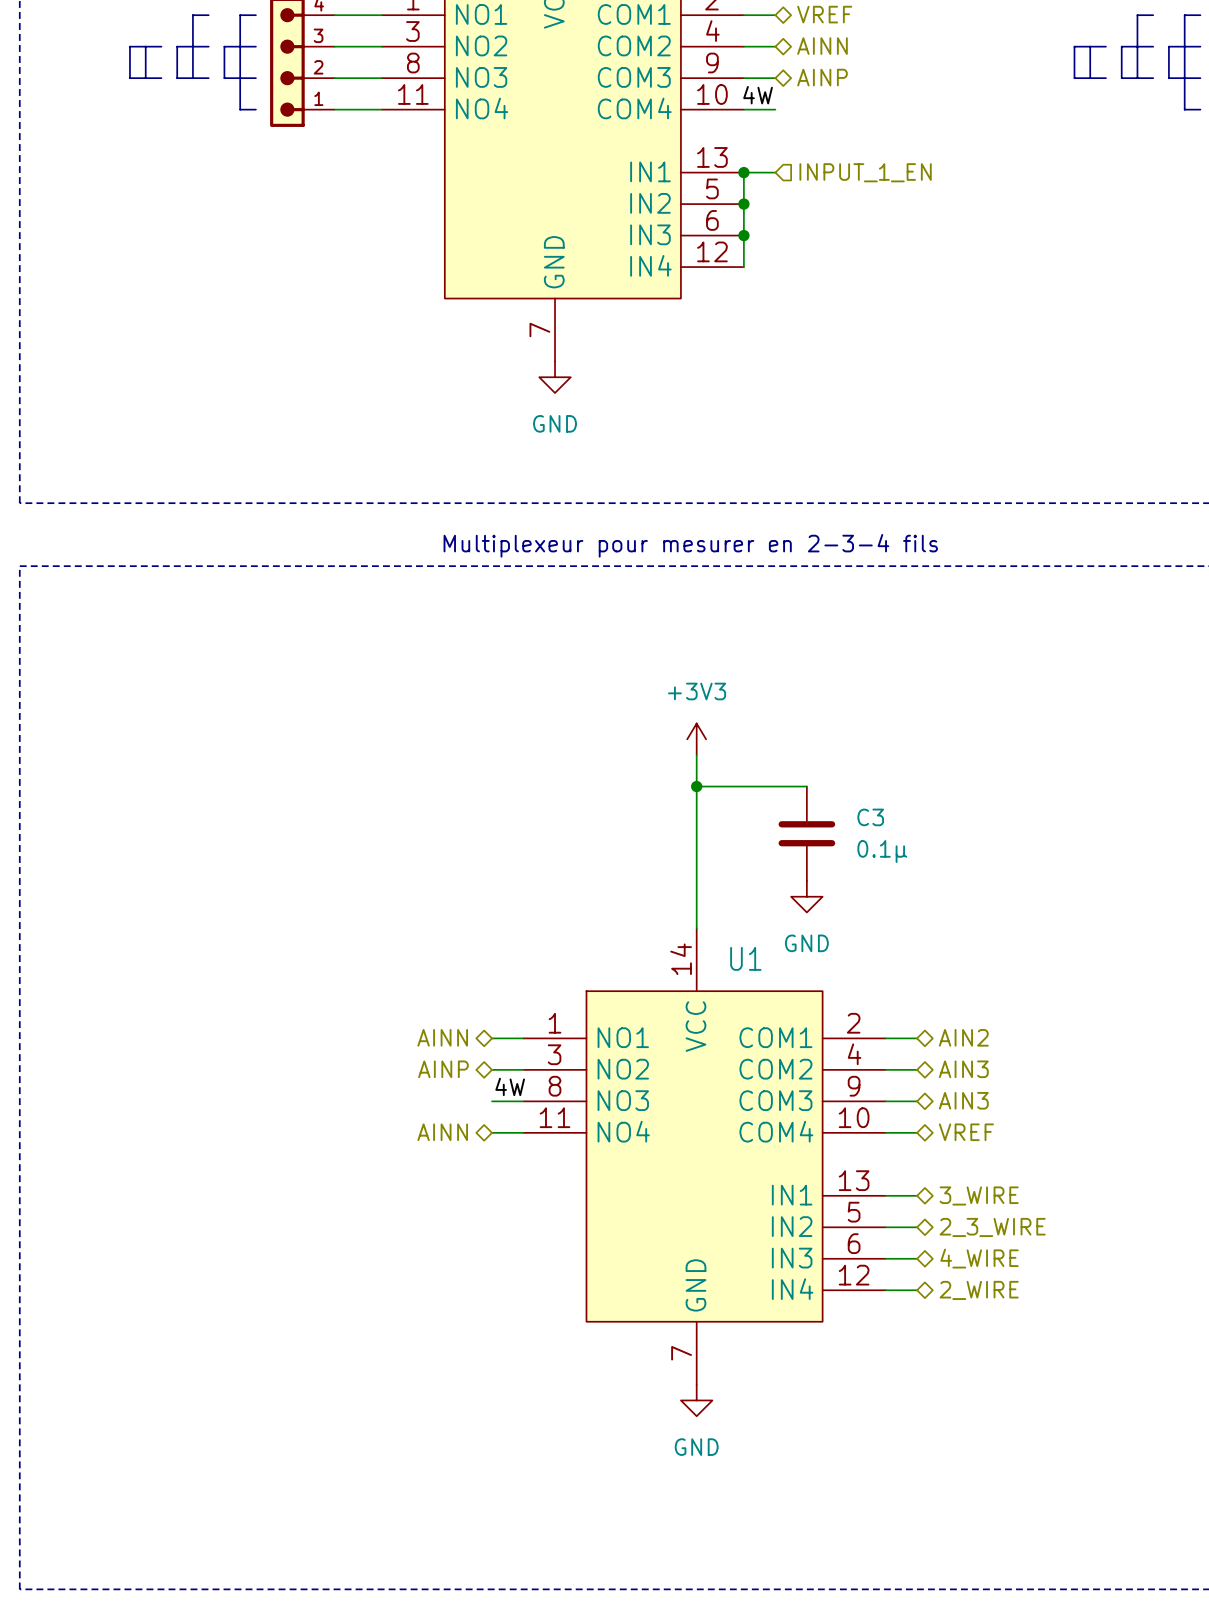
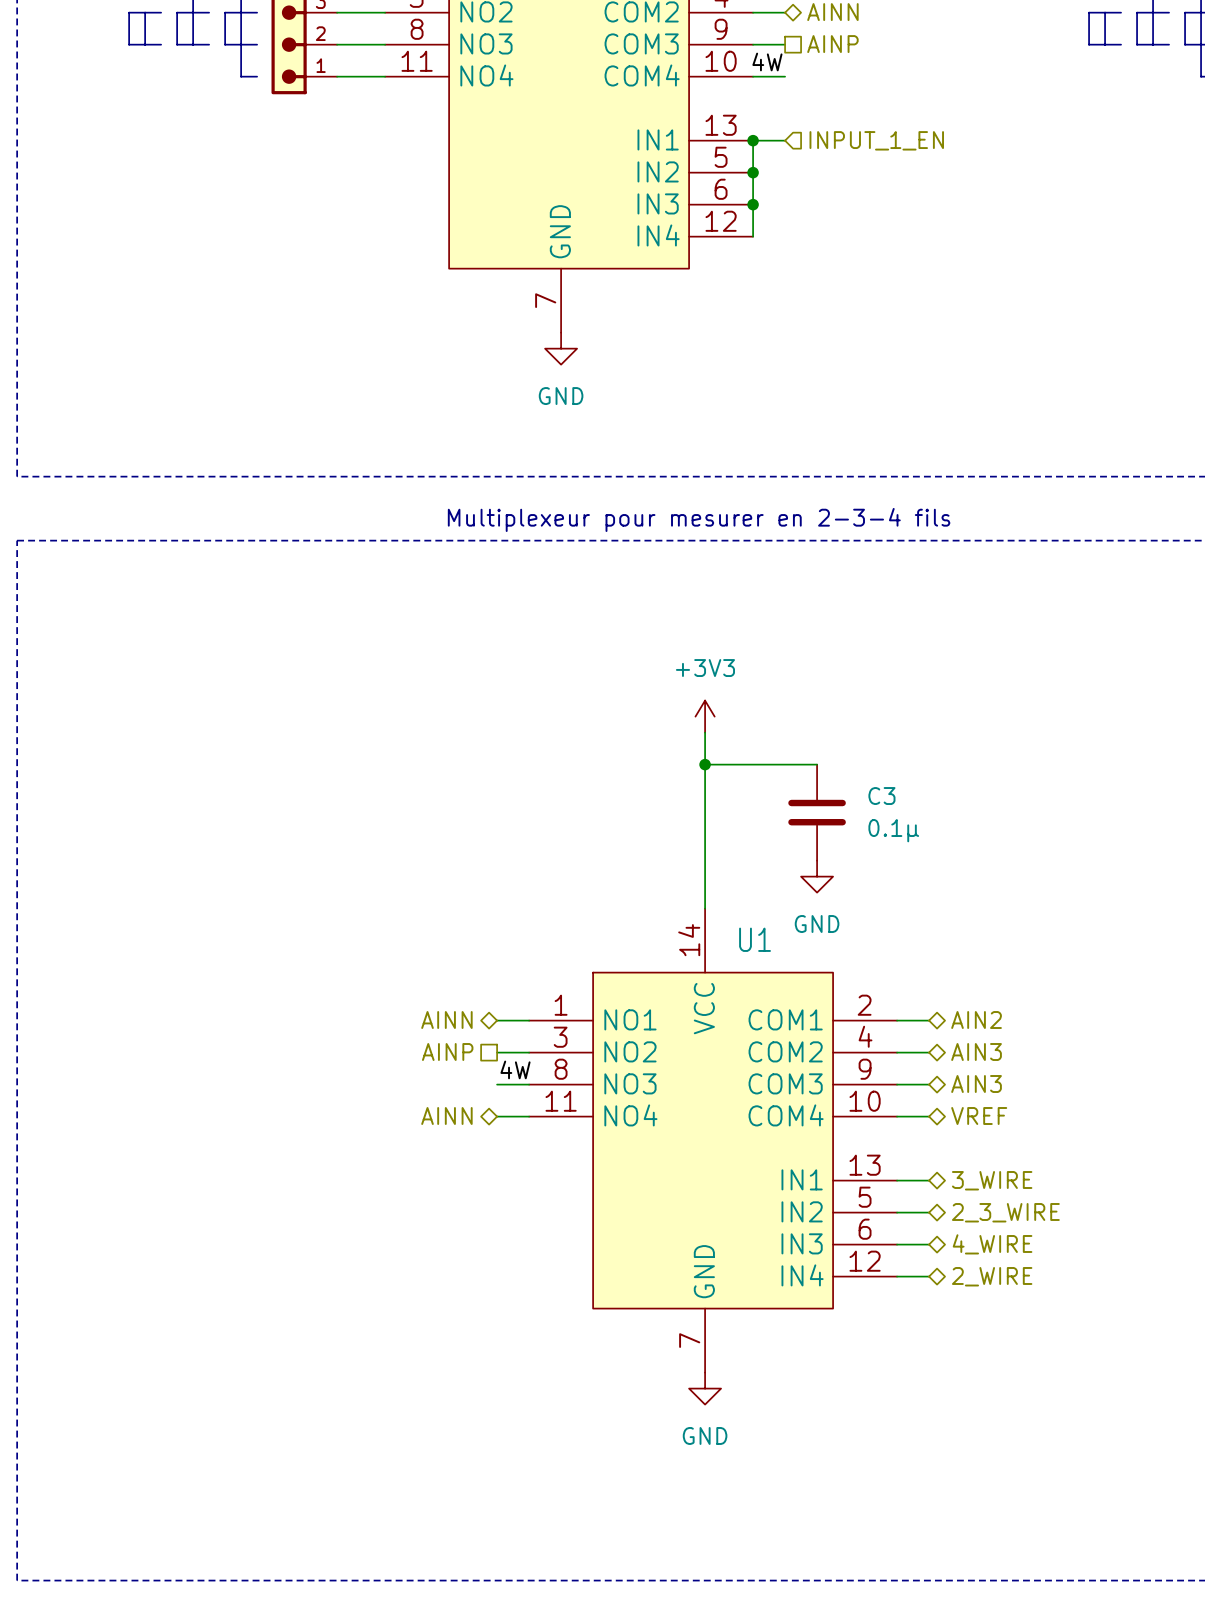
hierarchical label shape: bidirectional (822, 77) -> passive (832, 44)
hierarchical label shape: bidirectional (443, 1069) -> passive (447, 1052)

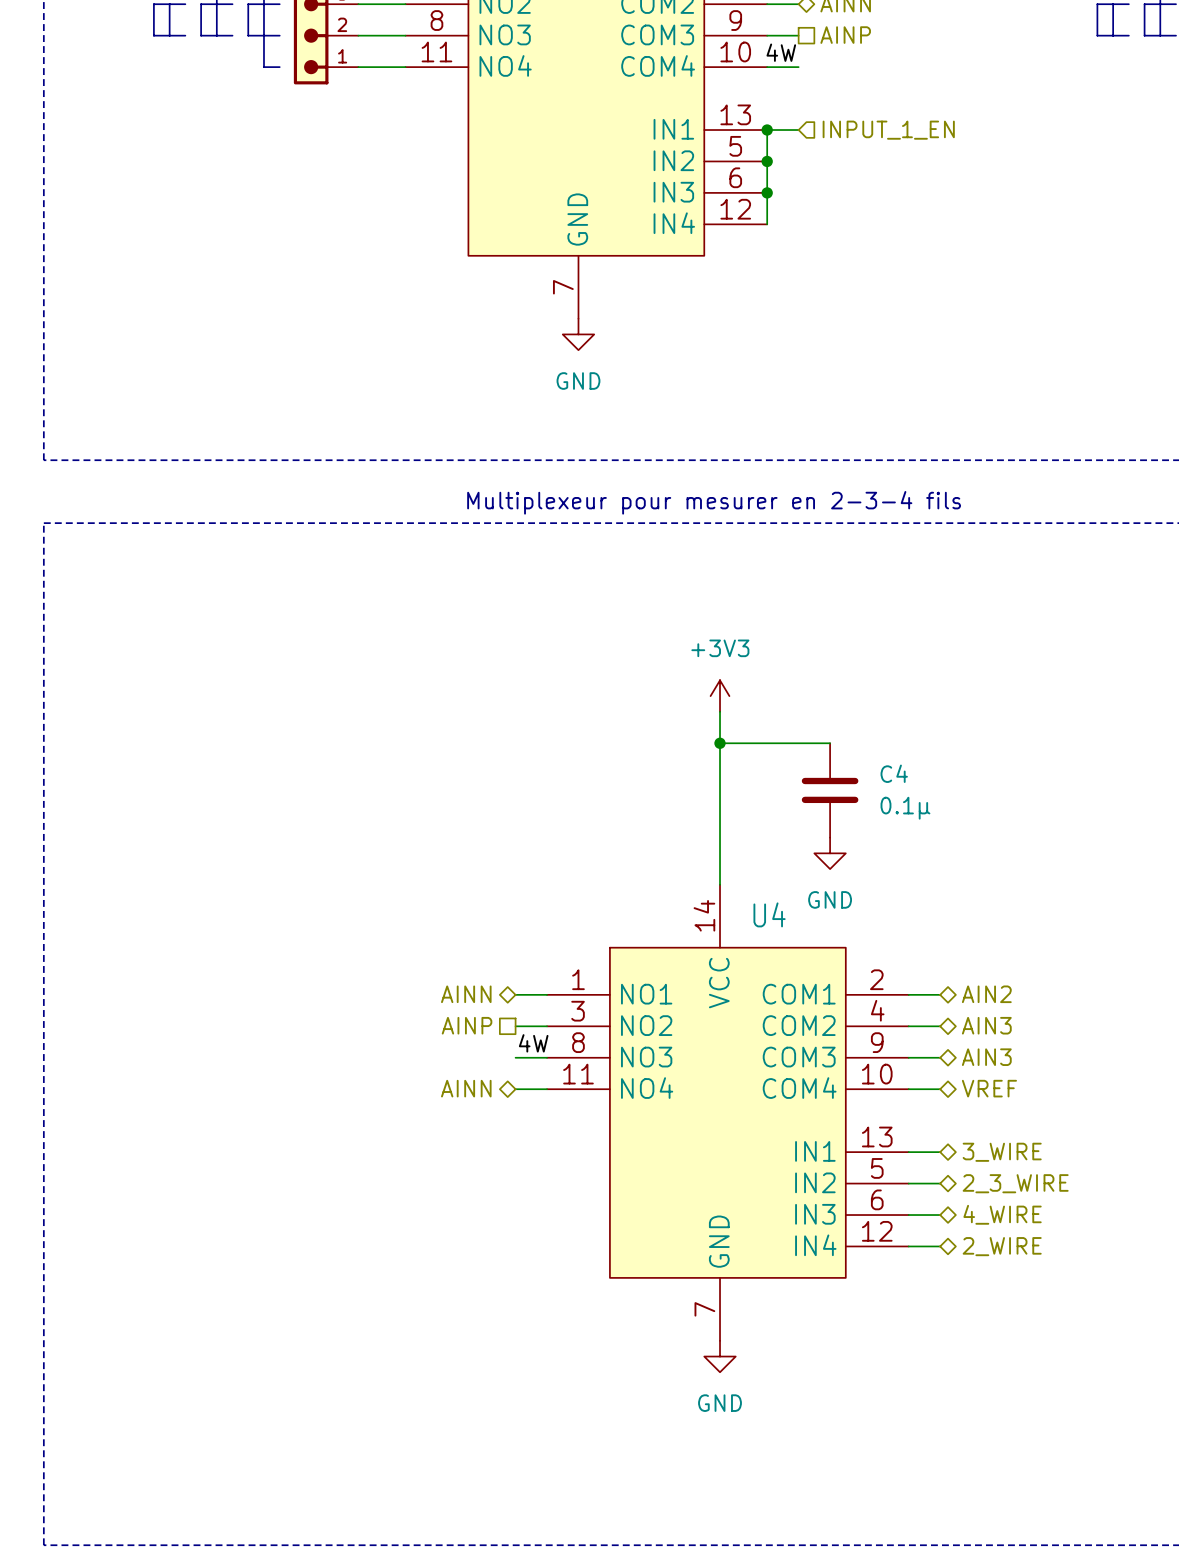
C3 name: C3 (881, 796) -> C4 (894, 773)
U1 name: U1 (755, 939) -> U4 (769, 914)

